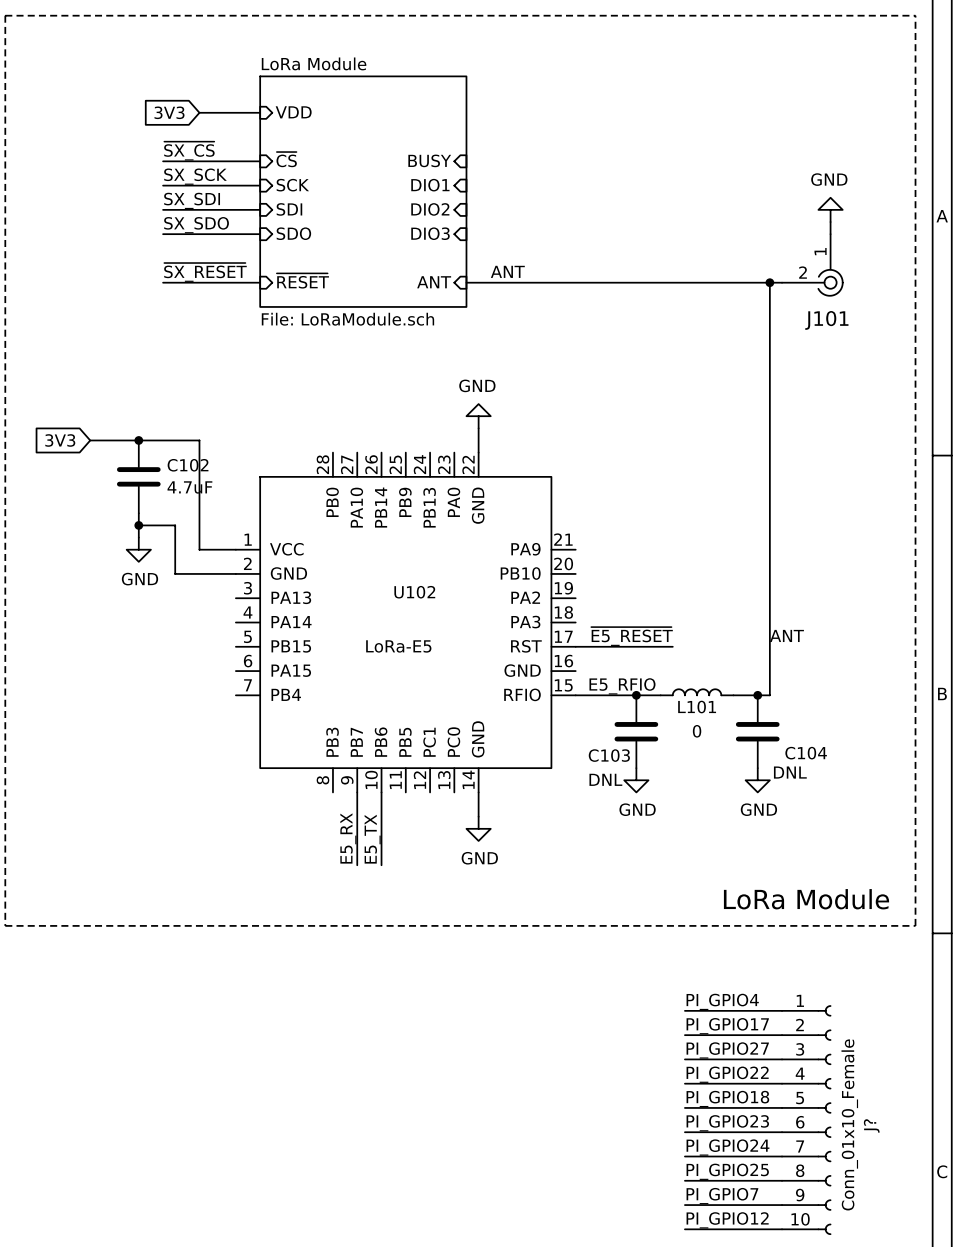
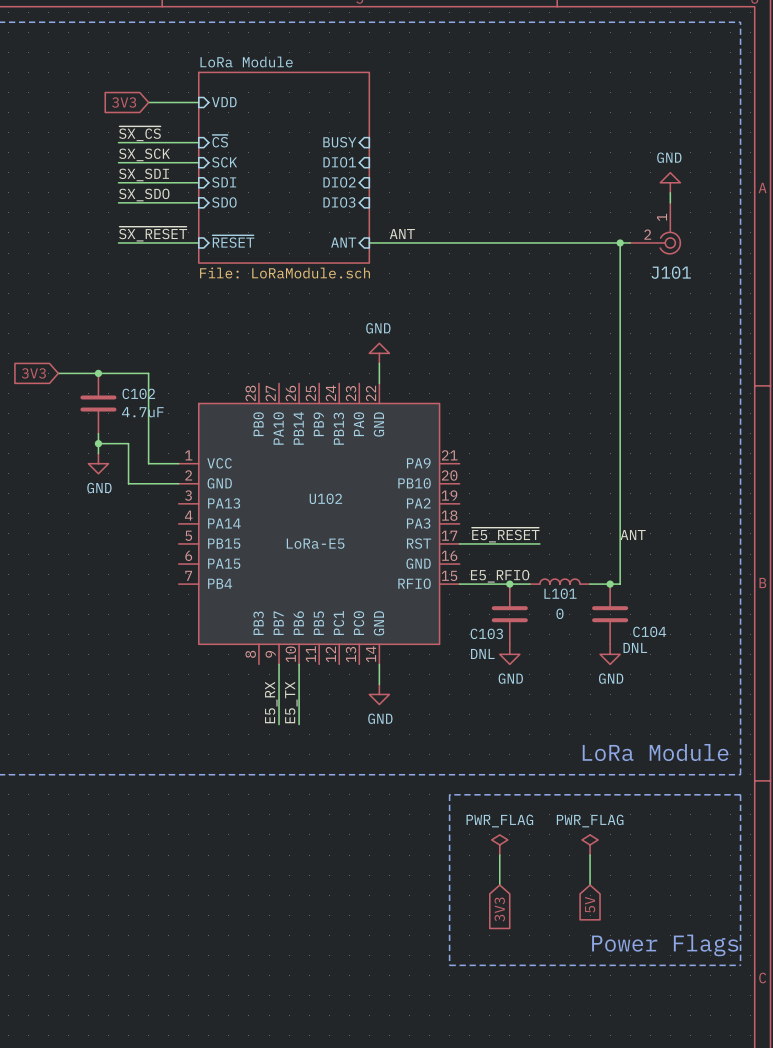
line: none -> (449, 794) (449, 965) (740, 965) (740, 794) (449, 794)
label: PI_GPIO4 (722, 1001) -> none
power symbol: none -> PWR_FLAG (499, 844)
wire: (684, 1010) (782, 1010) -> none
power symbol: none -> PWR_FLAG (590, 844)
wire: none -> (499, 855) (499, 885)
wire: none -> (590, 855) (590, 885)
label: PI_GPIO17 (727, 1026) -> none
wire: (684, 1035) (782, 1035) -> none
label: PI_GPIO27 (727, 1050) -> none
wire: (684, 1059) (782, 1059) -> none
label: PI_GPIO22 (727, 1074) -> none
wire: (684, 1083) (782, 1083) -> none
global label: none -> 5V (590, 904)
global label: none -> 3V3 (499, 909)
label: PI_GPIO18 (727, 1098) -> none
wire: (684, 1107) (782, 1107) -> none
J?: Conn_01x10_Female (806, 1120) -> none
label: PI_GPIO23 (727, 1123) -> none
wire: (684, 1132) (782, 1132) -> none
text: none -> Power Flags (665, 945)
label: PI_GPIO24 (727, 1147) -> none
label: PI_GPIO25 (727, 1171) -> none
wire: (684, 1180) (782, 1180) -> none
label: PI_GPIO7 (722, 1196) -> none
wire: (684, 1205) (782, 1205) -> none
label: PI_GPIO12 (727, 1220) -> none
wire: (684, 1229) (782, 1229) -> none

